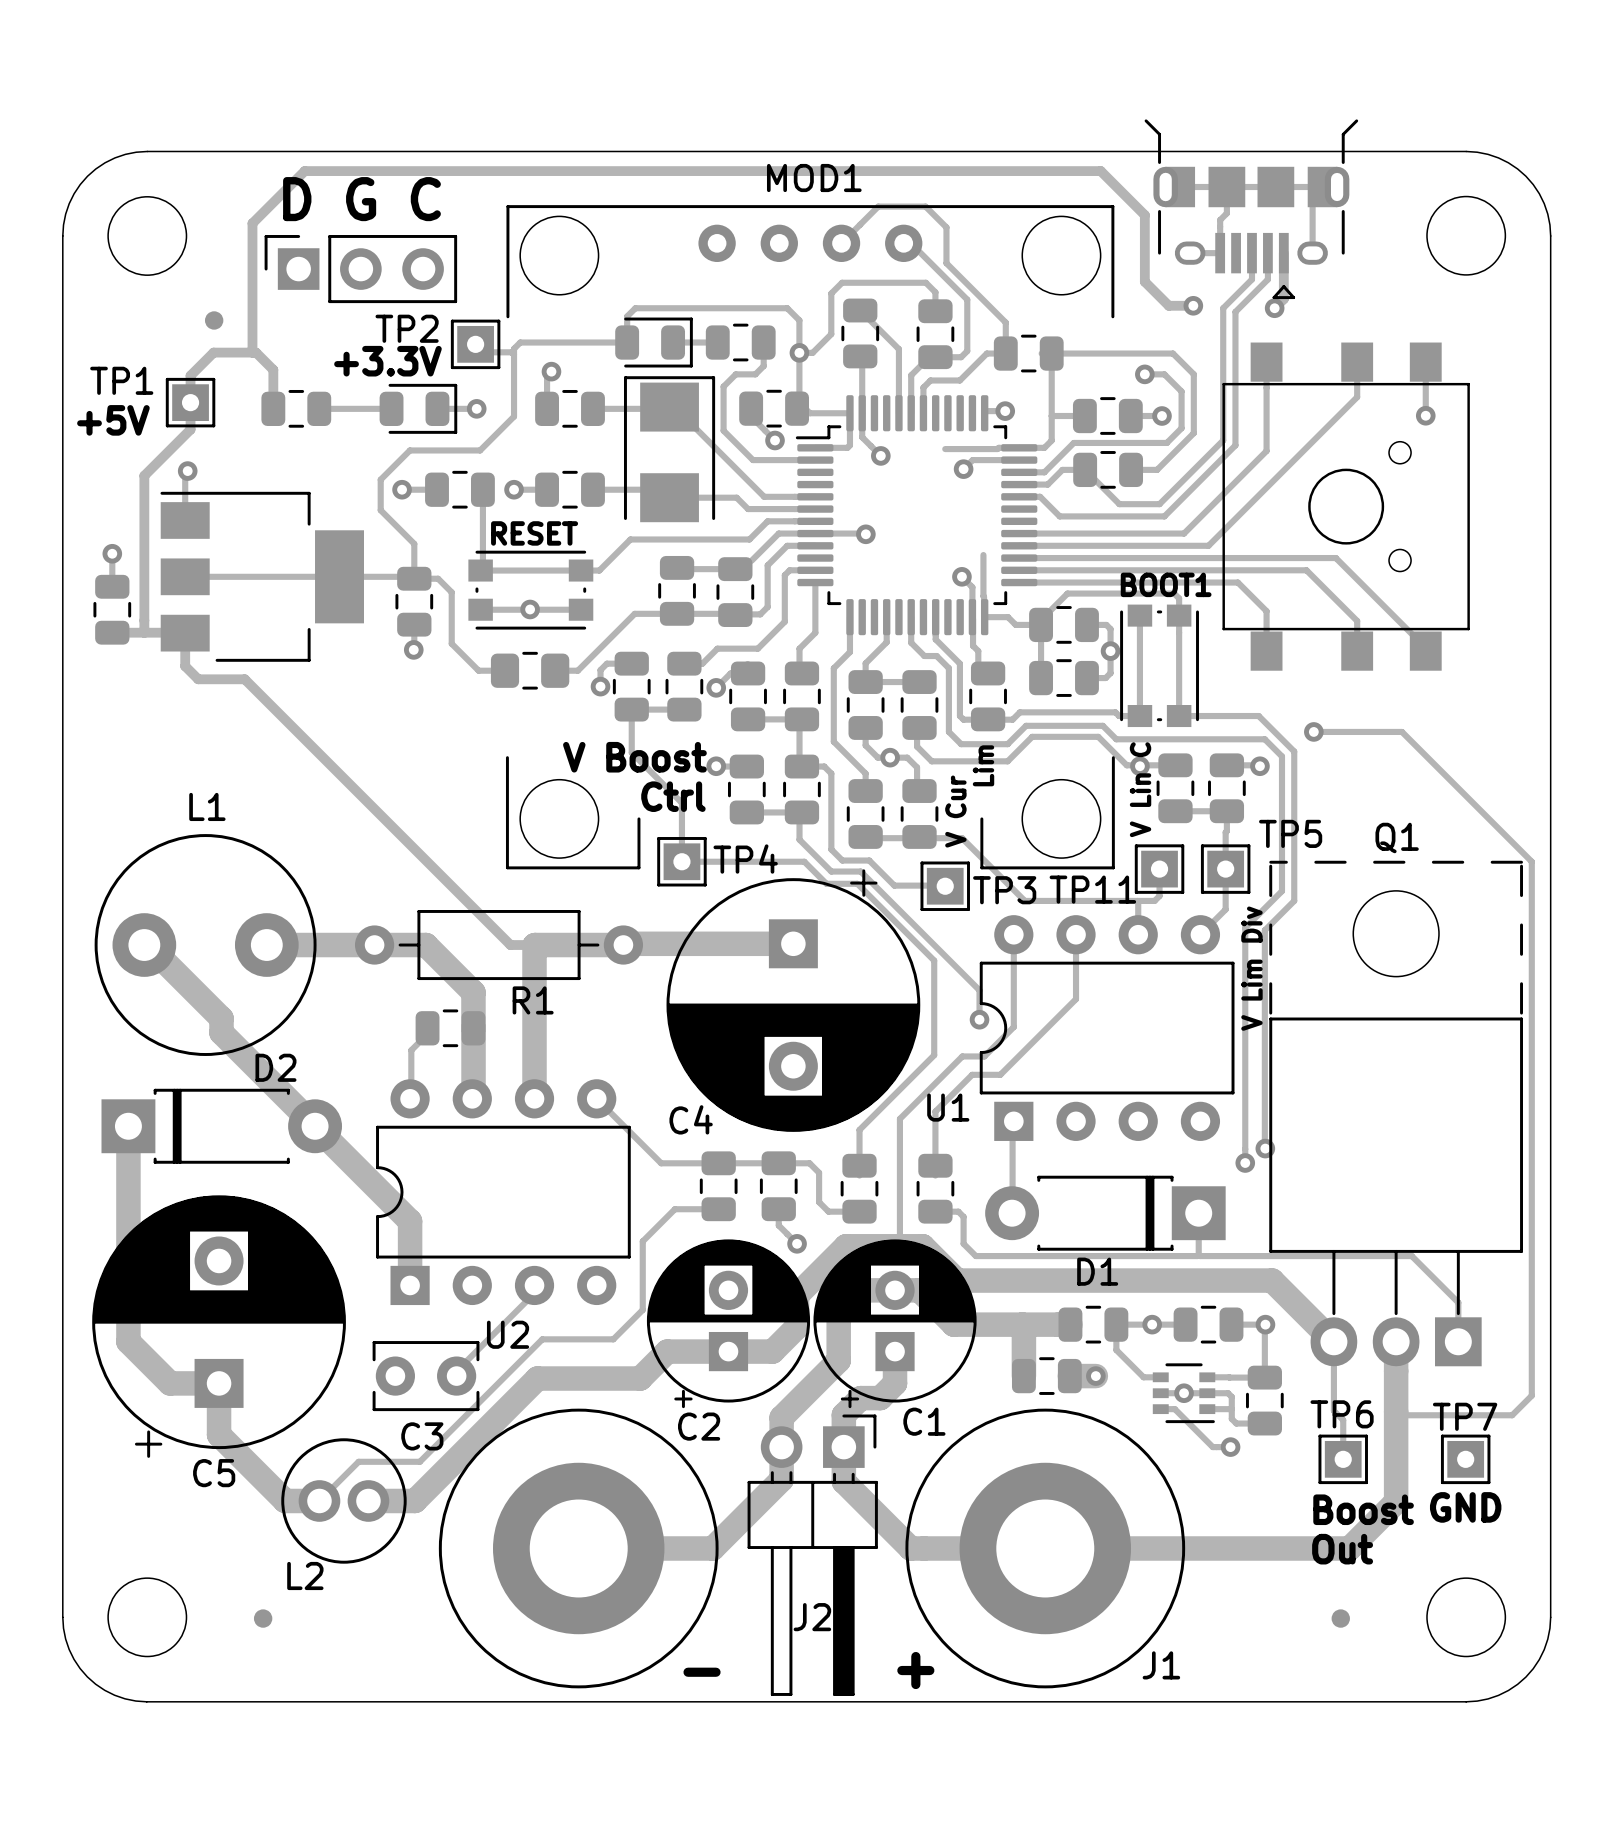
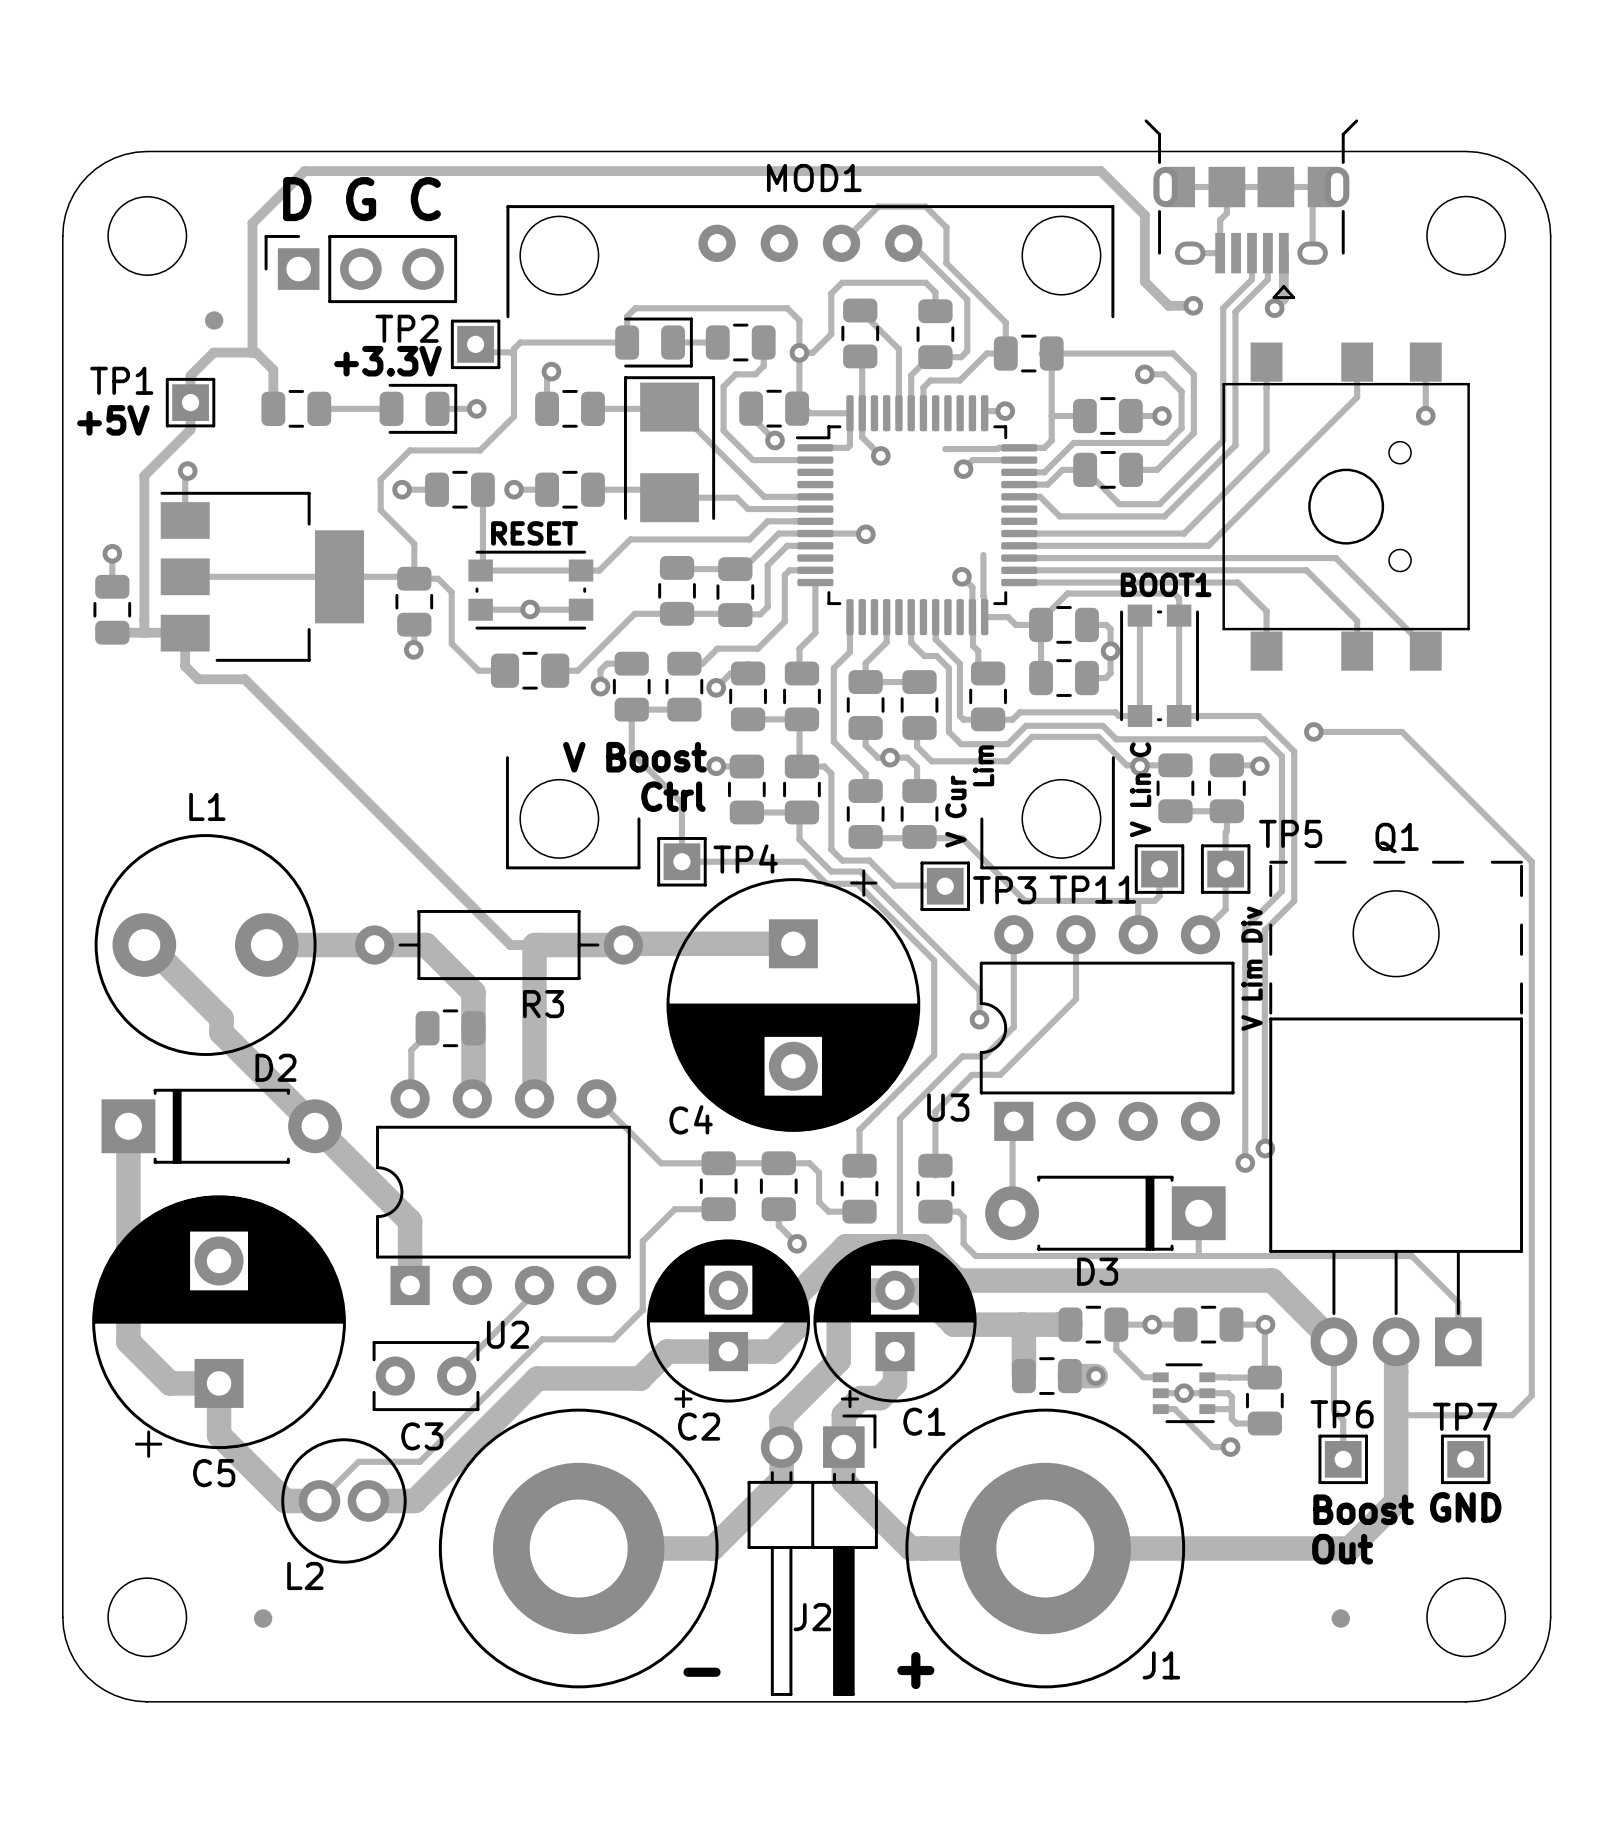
R1 name: R1 (533, 1000) -> R3 (543, 1004)
U1 name: U1 (948, 1107) -> U3 (948, 1107)
D1 name: D1 (1097, 1271) -> D3 (1097, 1271)

